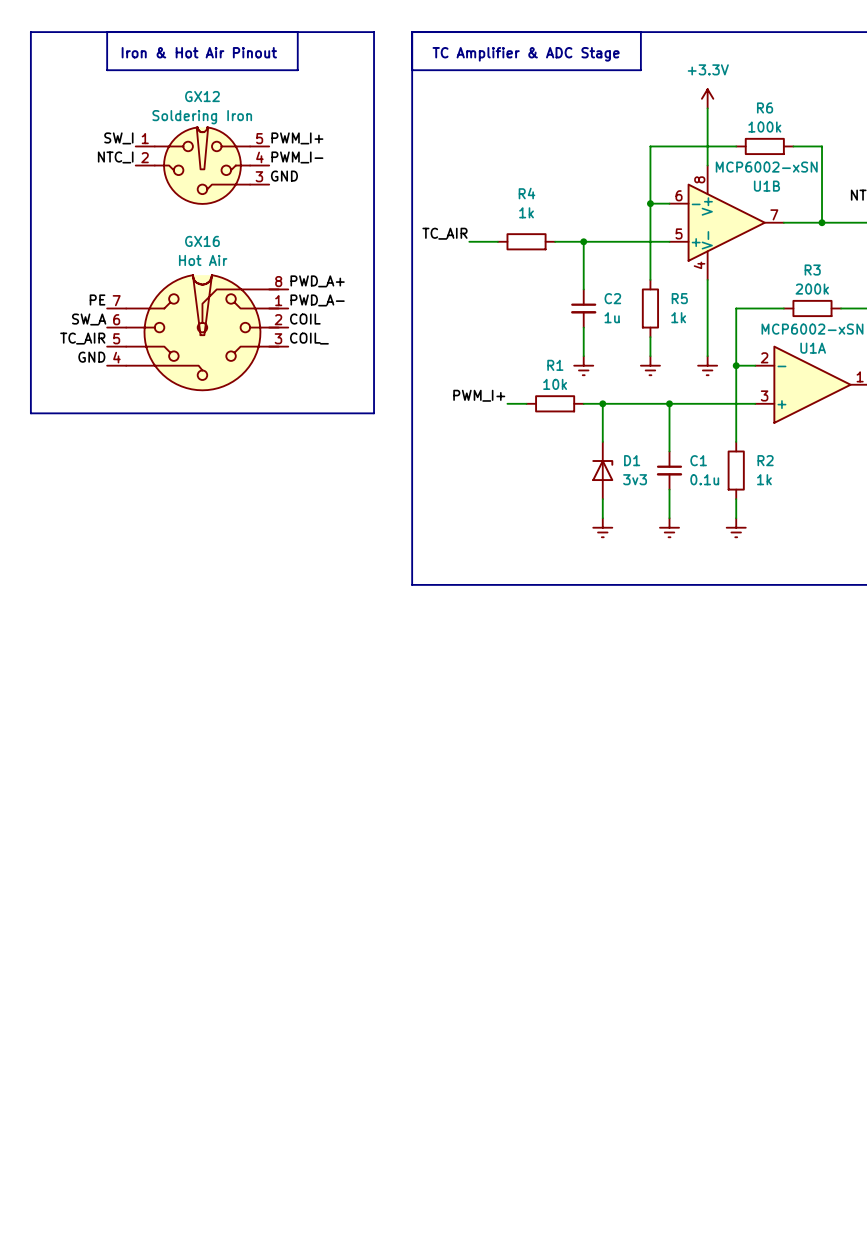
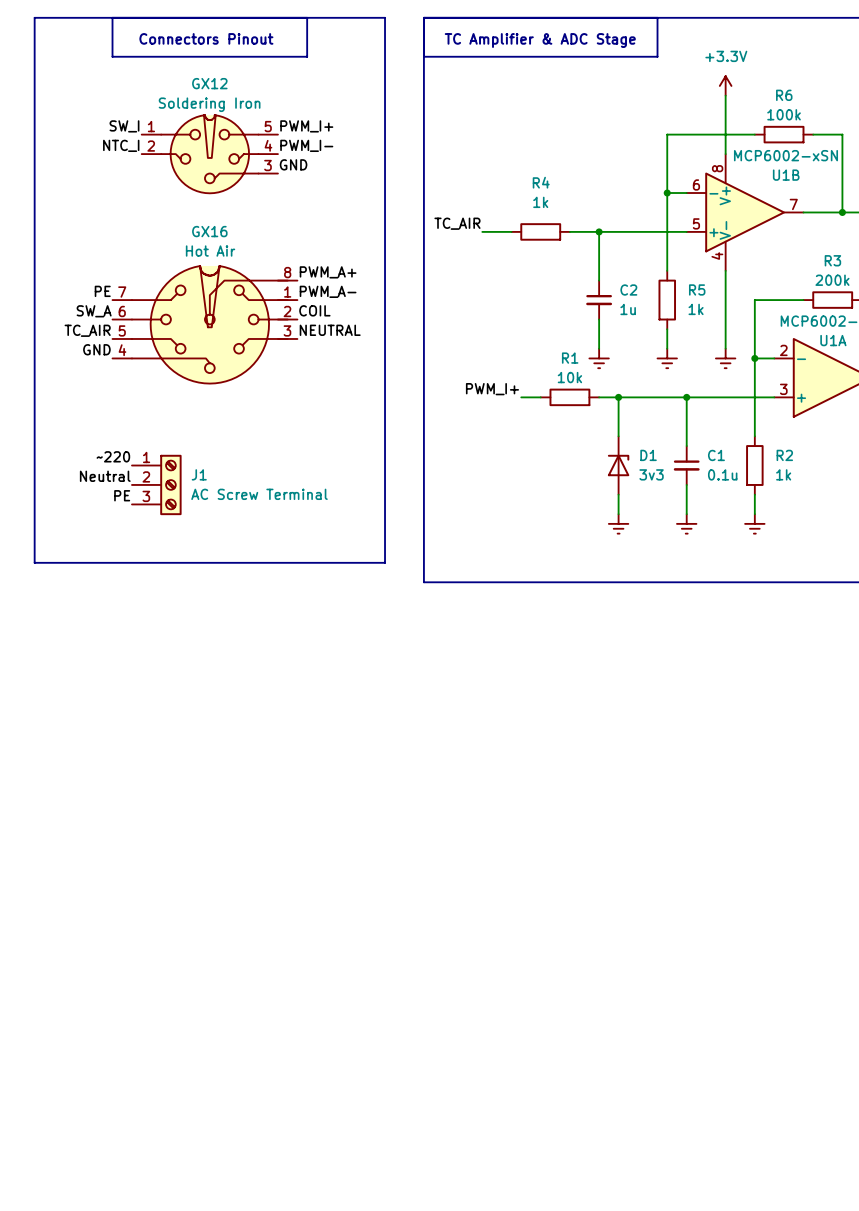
text: Iron & Hot Air Pinout (199, 52) -> Connectors Pinout (206, 38)
label: PWD_A+ (317, 281) -> PWM_A+ (328, 272)
label: PWD_A- (317, 300) -> PWM_A- (328, 291)
label: COIL_ (309, 338) -> NEUTRAL (330, 330)
line: (30, 413) (374, 413) -> (34, 407) (34, 562) (385, 562) (385, 407)
label: none -> ~220 (113, 456)
label: none -> Neutral (105, 476)
J1: none -> AC Screw Terminal (156, 484)
label: none -> PE (122, 495)

